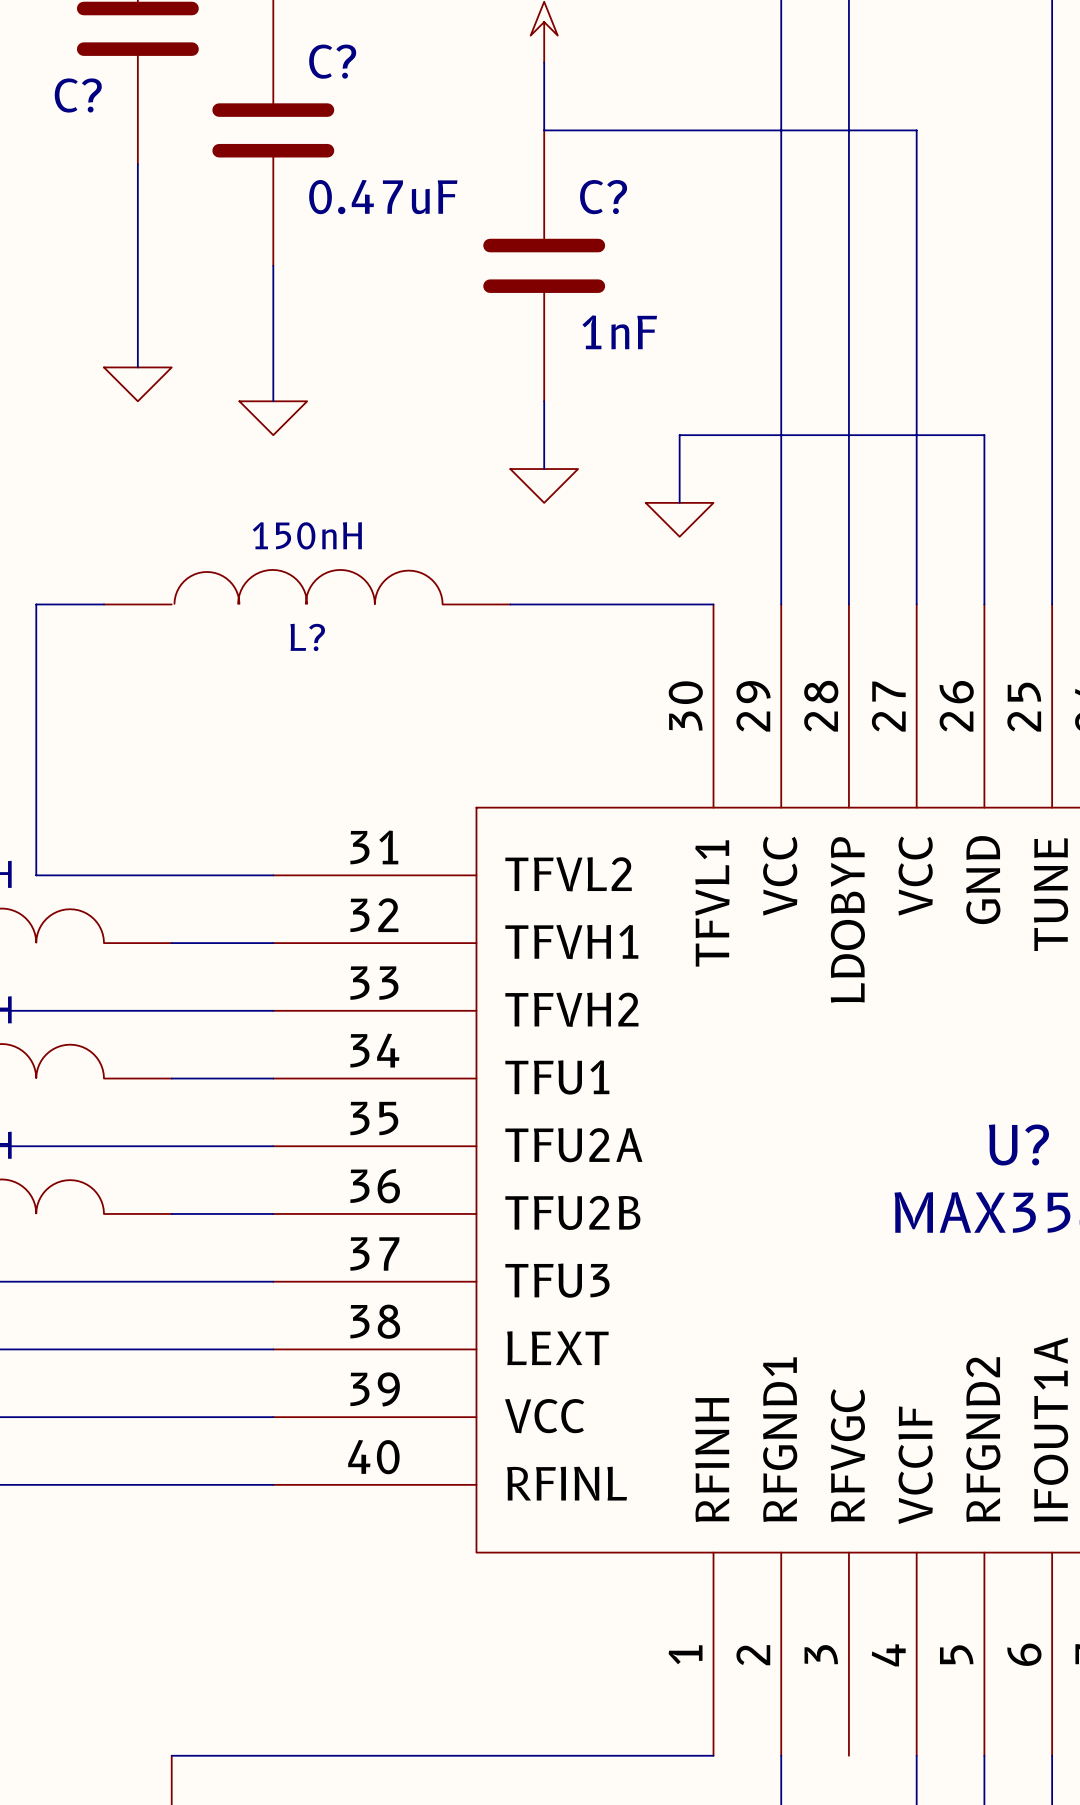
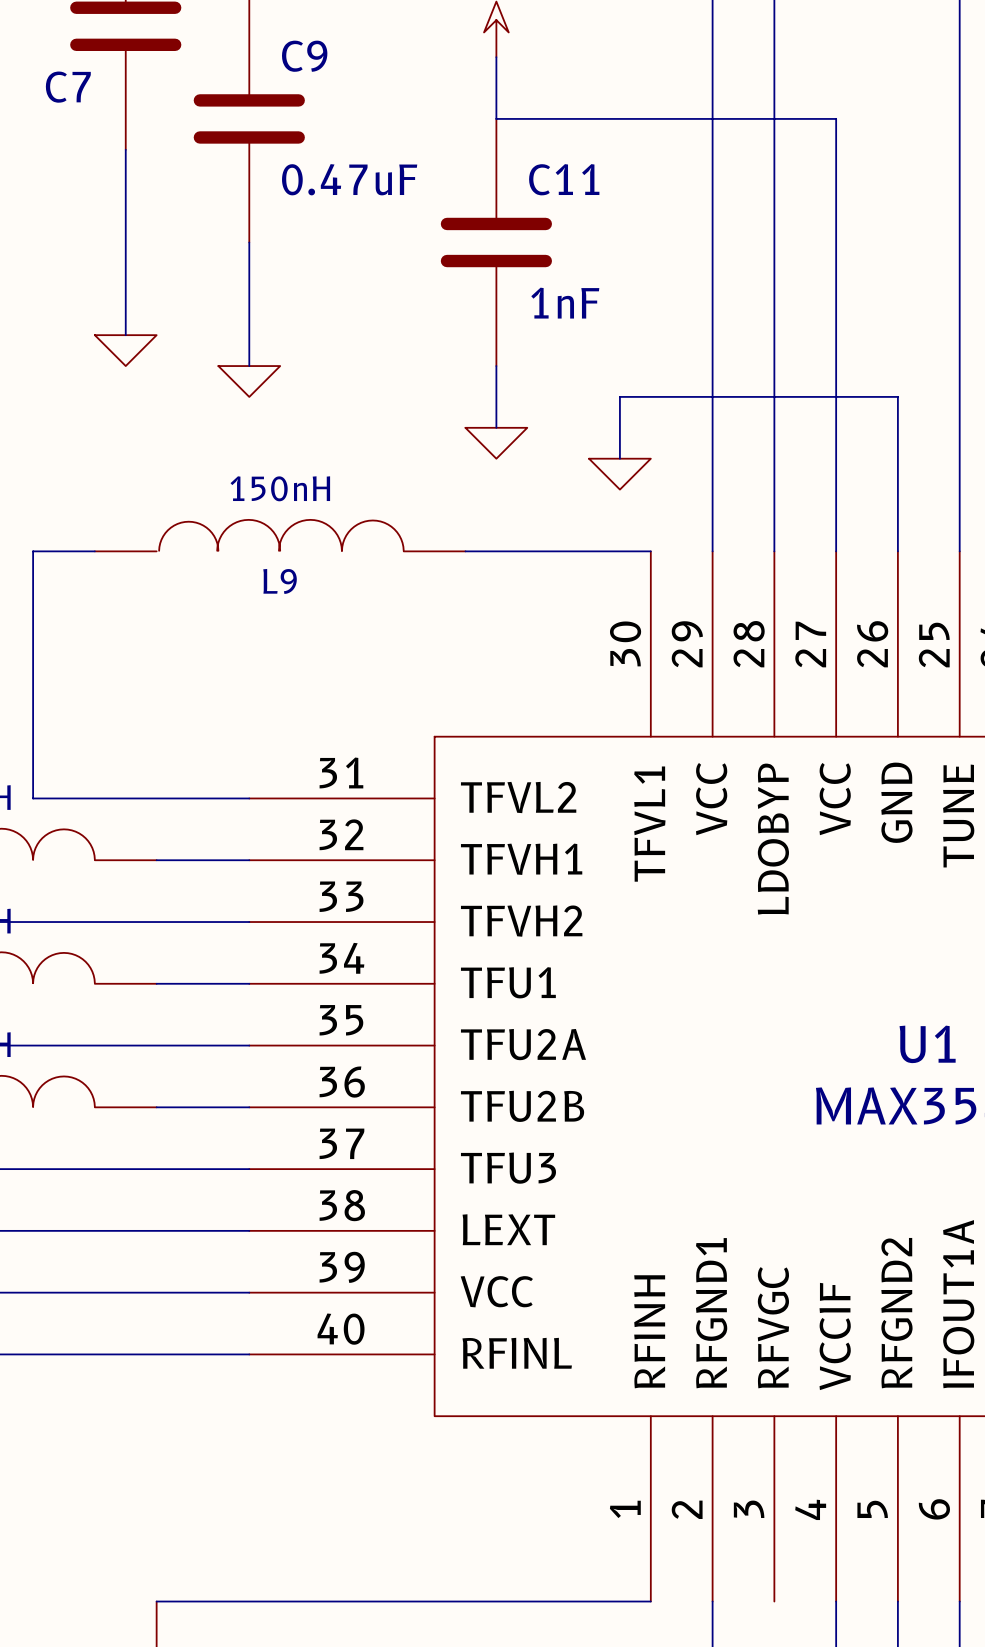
C? name: C? (332, 61) -> C9 (304, 56)
C? name: C? (78, 95) -> C7 (68, 87)
C? name: C? (603, 197) -> C11 (564, 179)
L? name: L? (307, 637) -> L9 (280, 581)
U? name: U? (1018, 1144) -> U1 (927, 1044)

